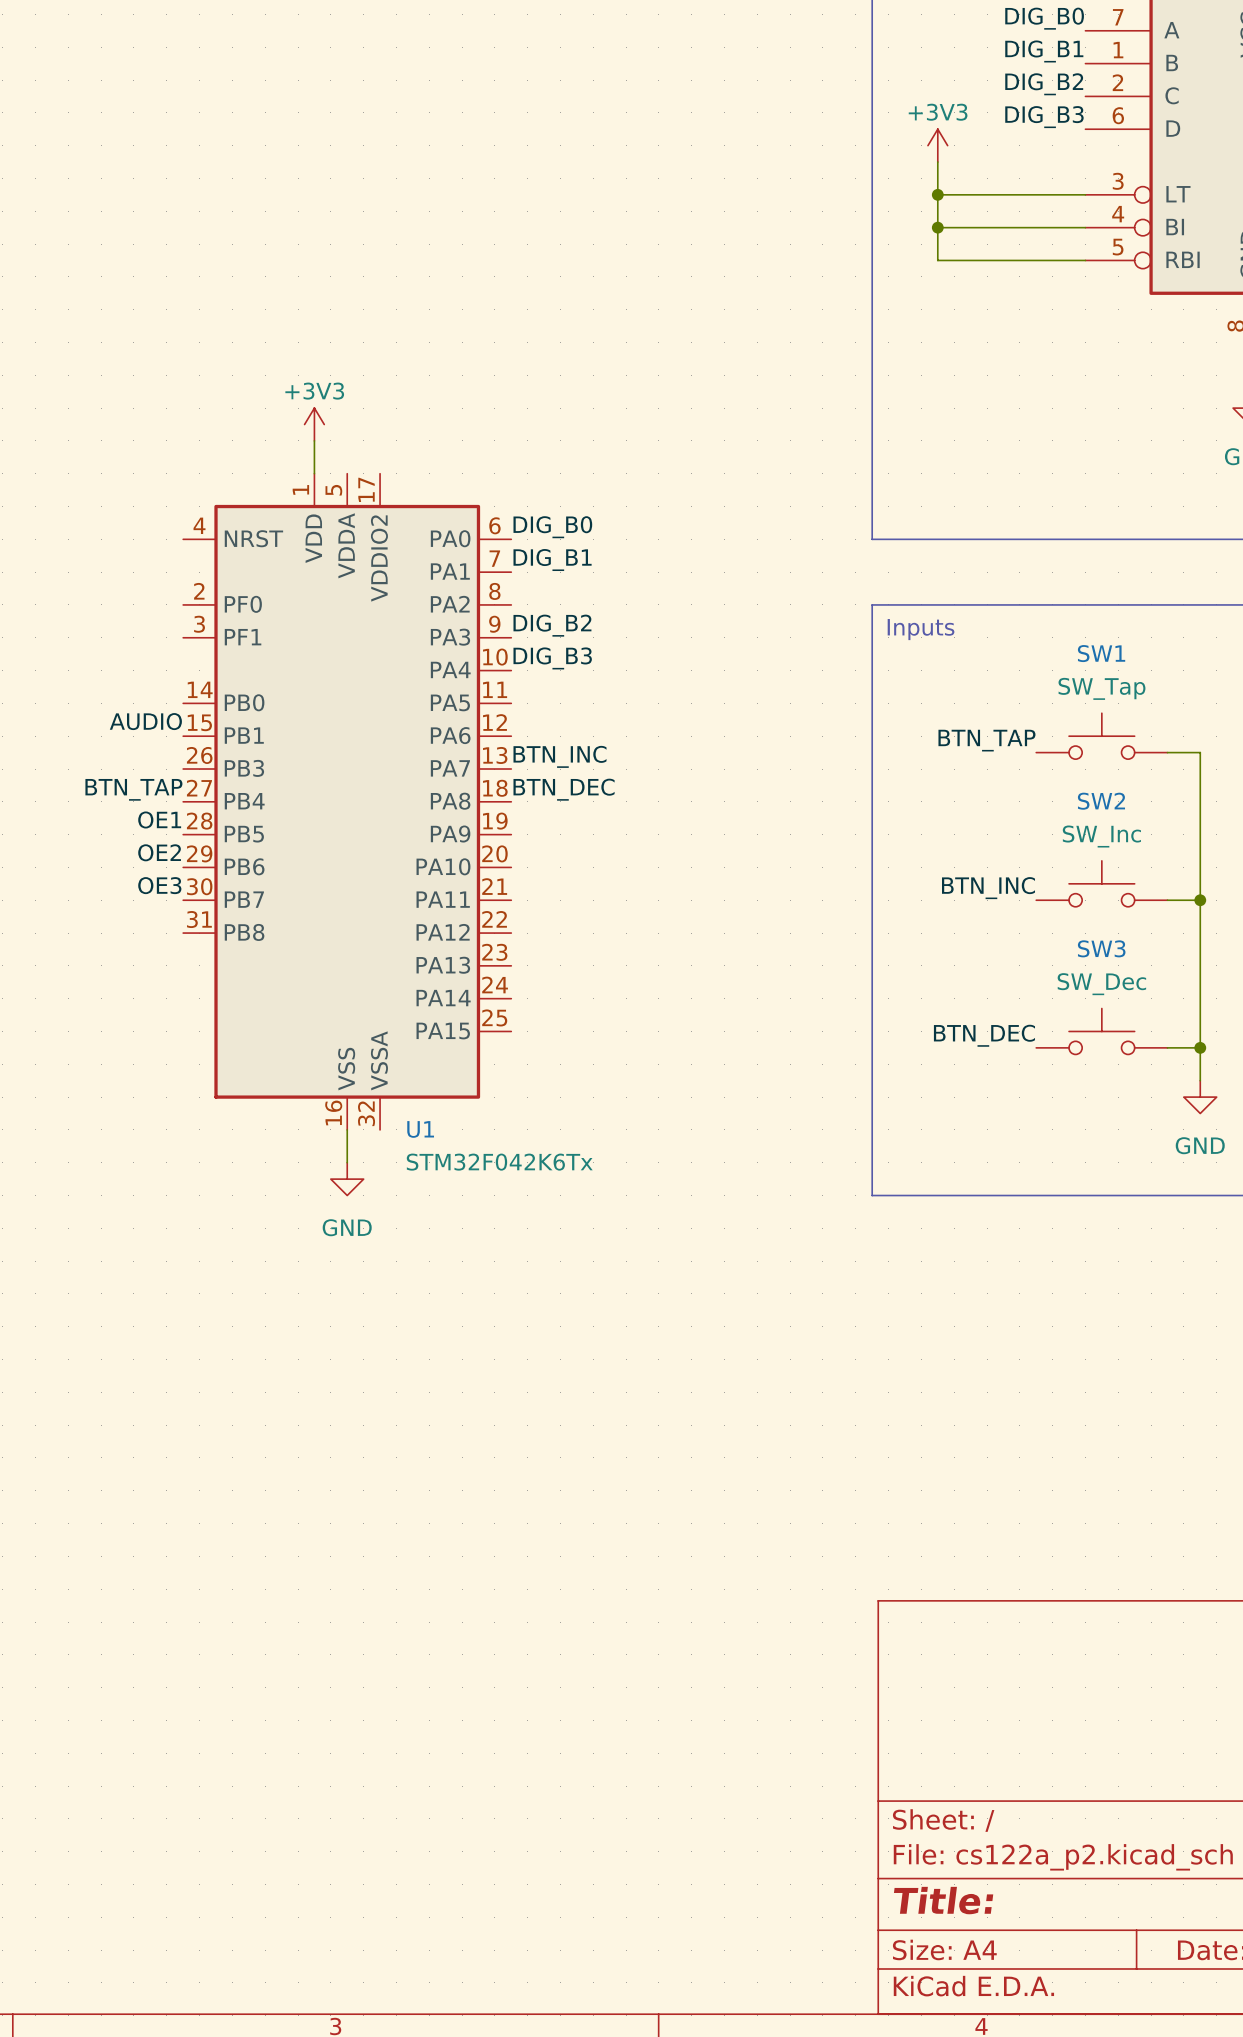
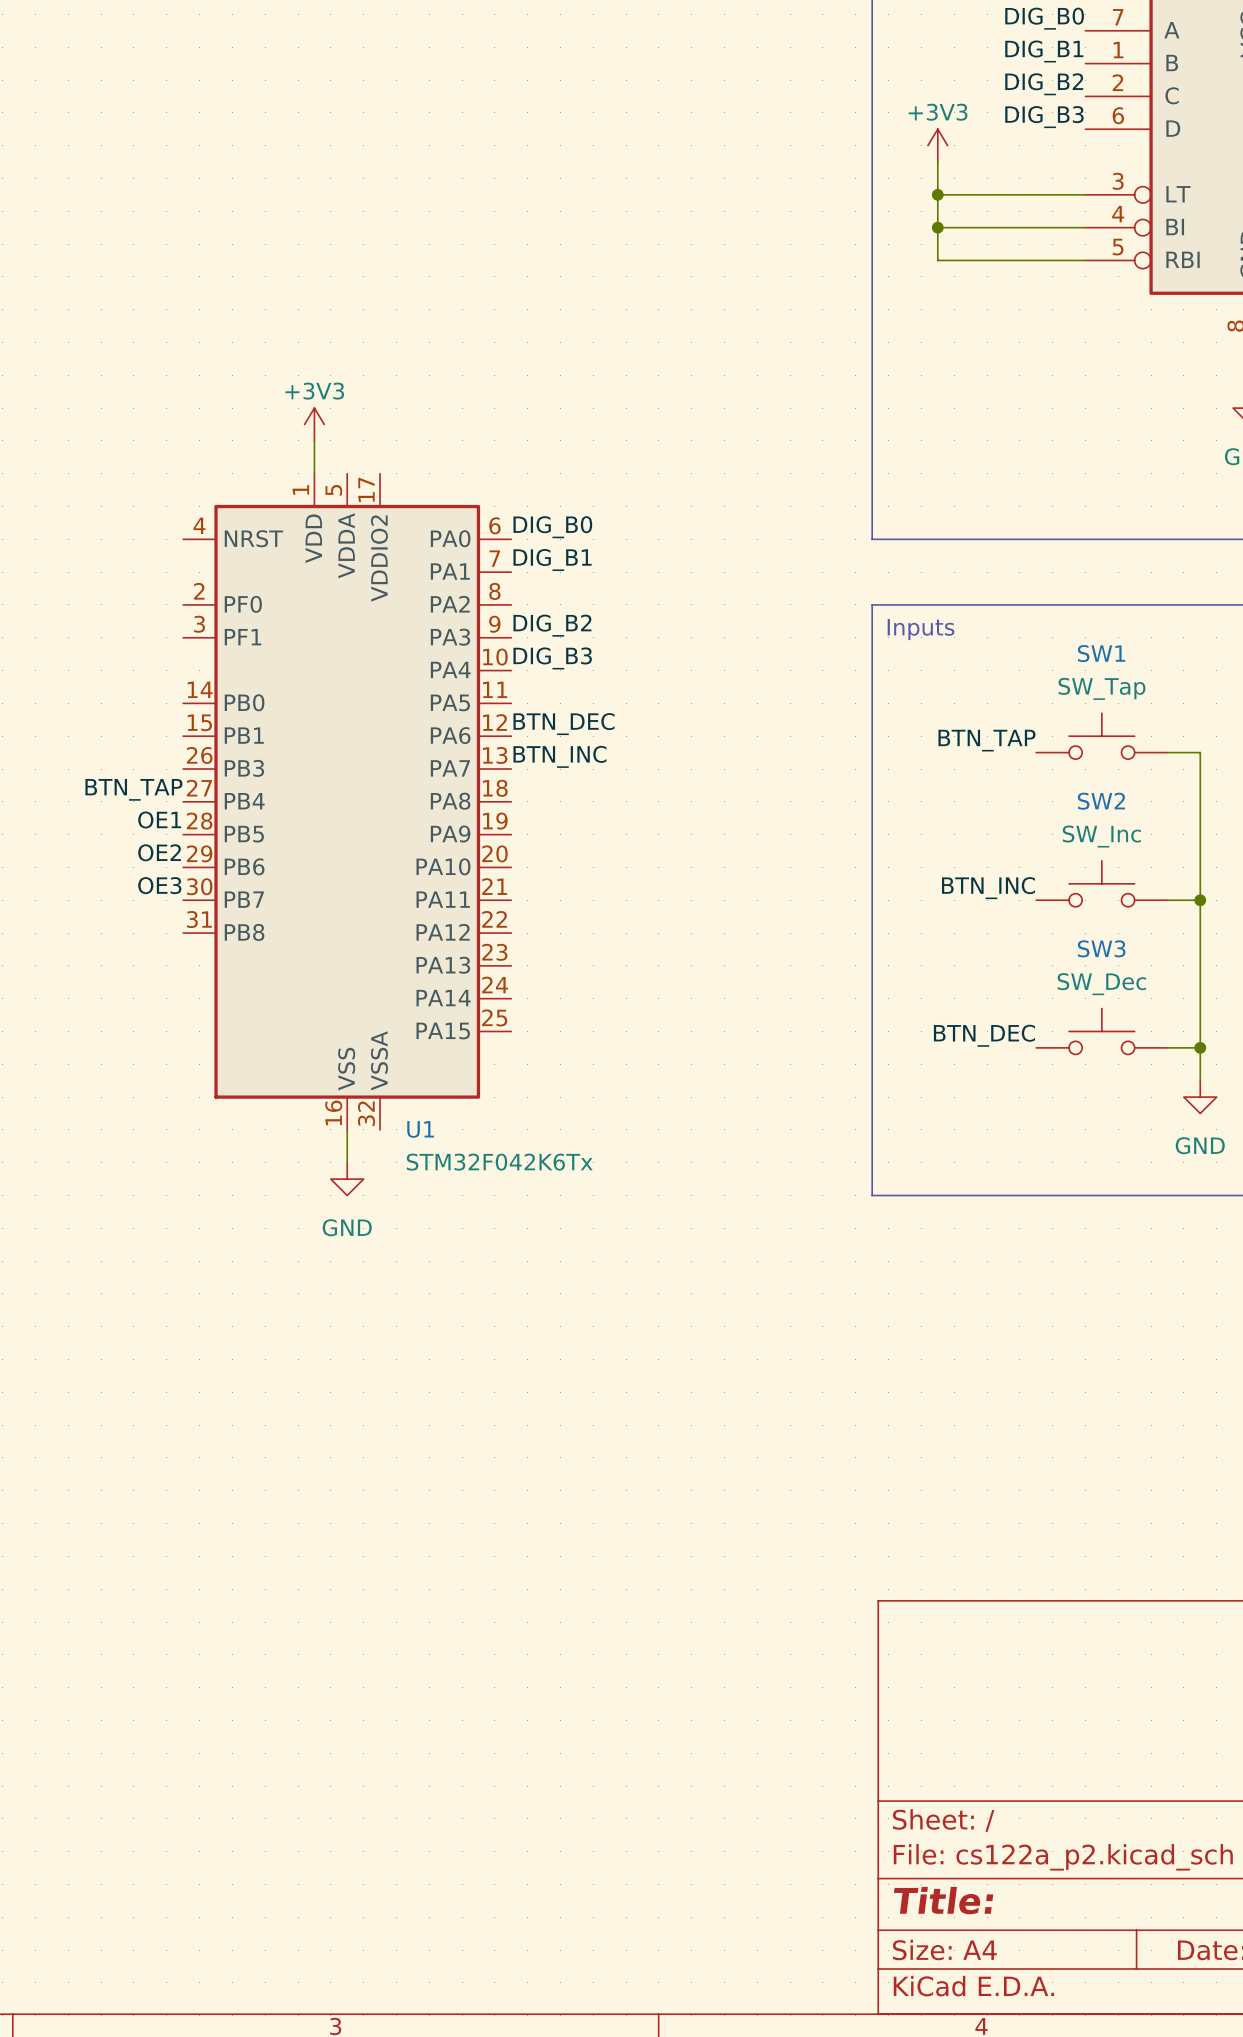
label: AUDIO (145, 721) -> none
label position: BTN_DEC (564, 789) -> BTN_DEC (564, 724)

